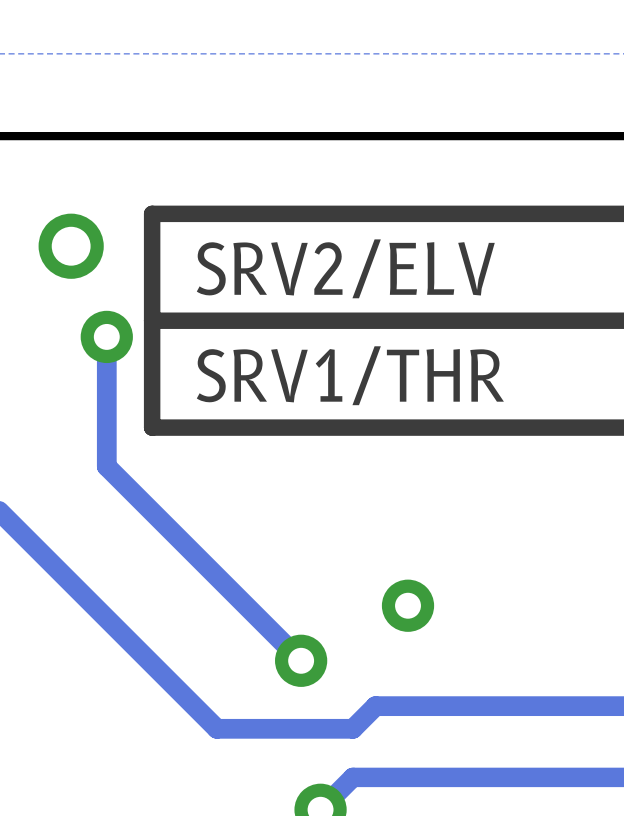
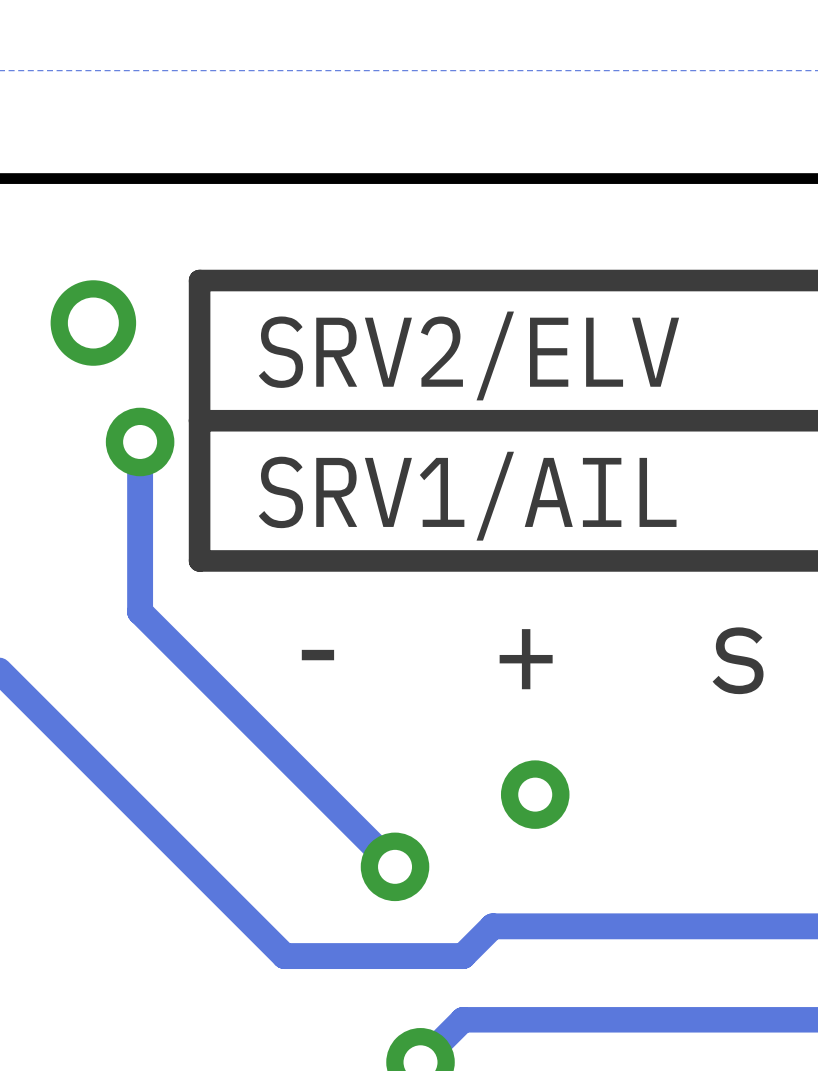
text: SRV1/THR (350, 375) -> SRV1/AIL (467, 496)
text: none -> + (526, 659)
text: none -> s (738, 660)
text: none -> - (317, 655)

